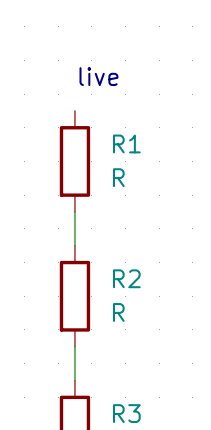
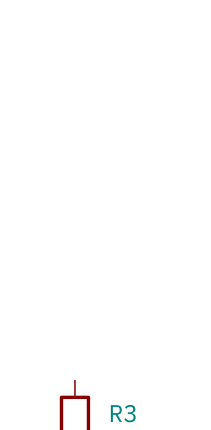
text: live (98, 76) -> none
R1: R (74, 161) -> none
wire: (74, 212) (74, 245) -> none
R2: R (74, 296) -> none
wire: (74, 346) (74, 380) -> none

